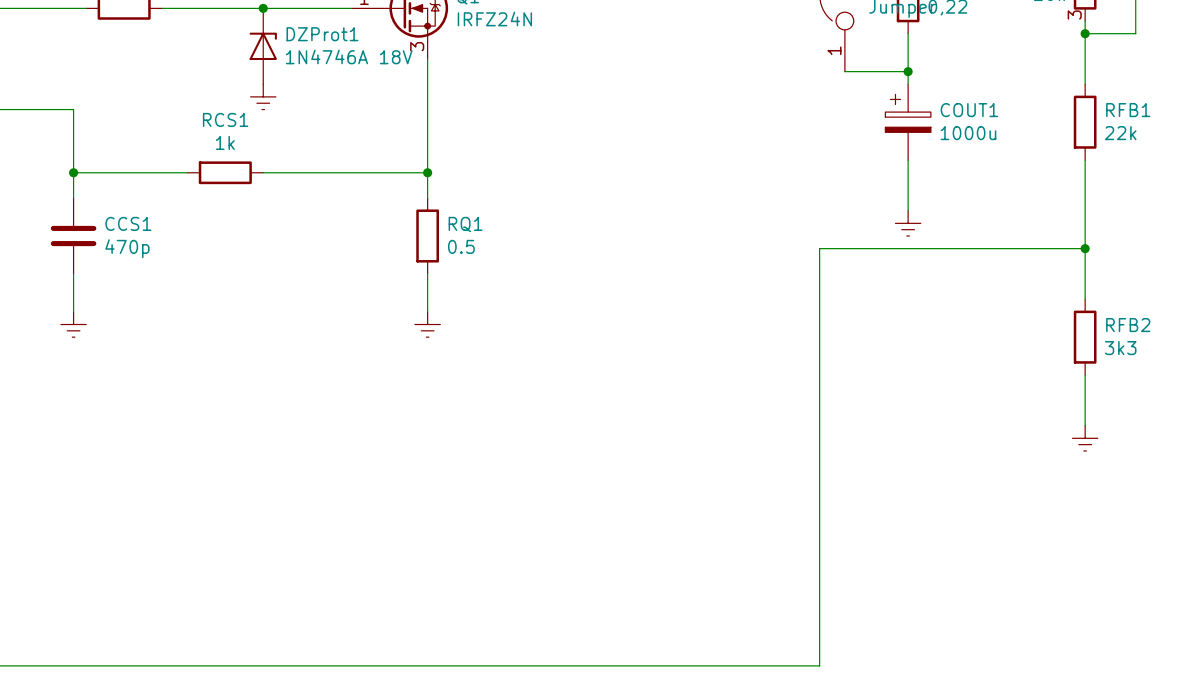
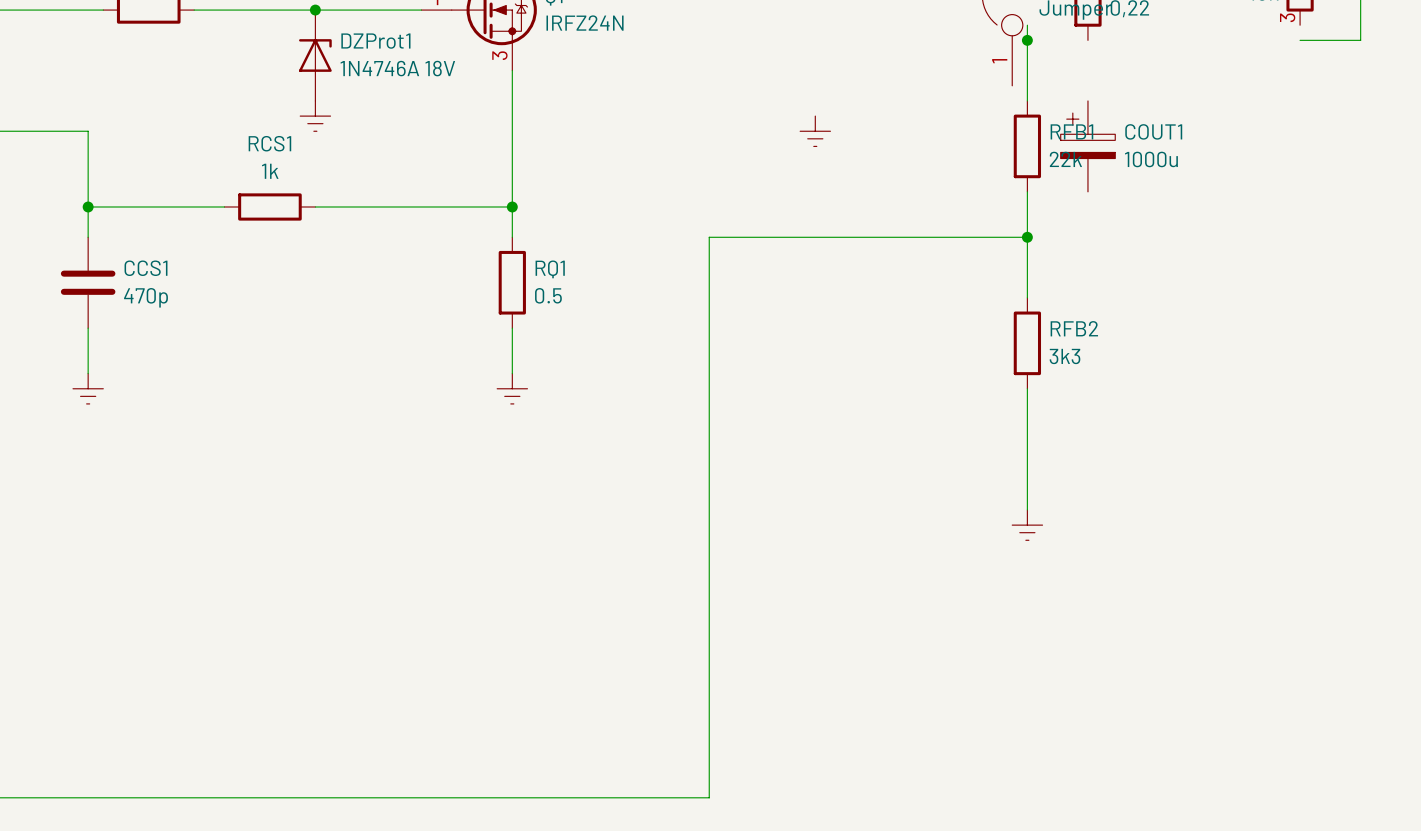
wire: (1085, 21) (1085, 84) -> (1027, 25) (1027, 100)
junction: none -> (1027, 40)
wire: (908, 33) (908, 84) -> none
junction: (1085, 33) -> none
wire: (844, 71) (908, 71) -> none
junction: (908, 71) -> none
power symbol: none -> (815, 131)
RFB1 position: (1085, 122) -> (1027, 146)
wire: none -> (1027, 191) (1027, 297)
wire: (908, 160) (908, 210) -> none
wire: (1085, 160) (1085, 299) -> none
junction: none -> (1027, 237)
power symbol: (908, 223) -> none
wire: (1085, 248) (819, 248) (819, 665) (592, 665) -> (1027, 237) (709, 237) (709, 797)
junction: (1085, 248) -> none
wire: none -> (1027, 388) (1027, 509)
RFB2 position: (1085, 337) -> (1027, 343)
wire: (1085, 375) (1085, 425) -> none
power symbol: none -> (1027, 525)
power symbol: (1085, 438) -> none

